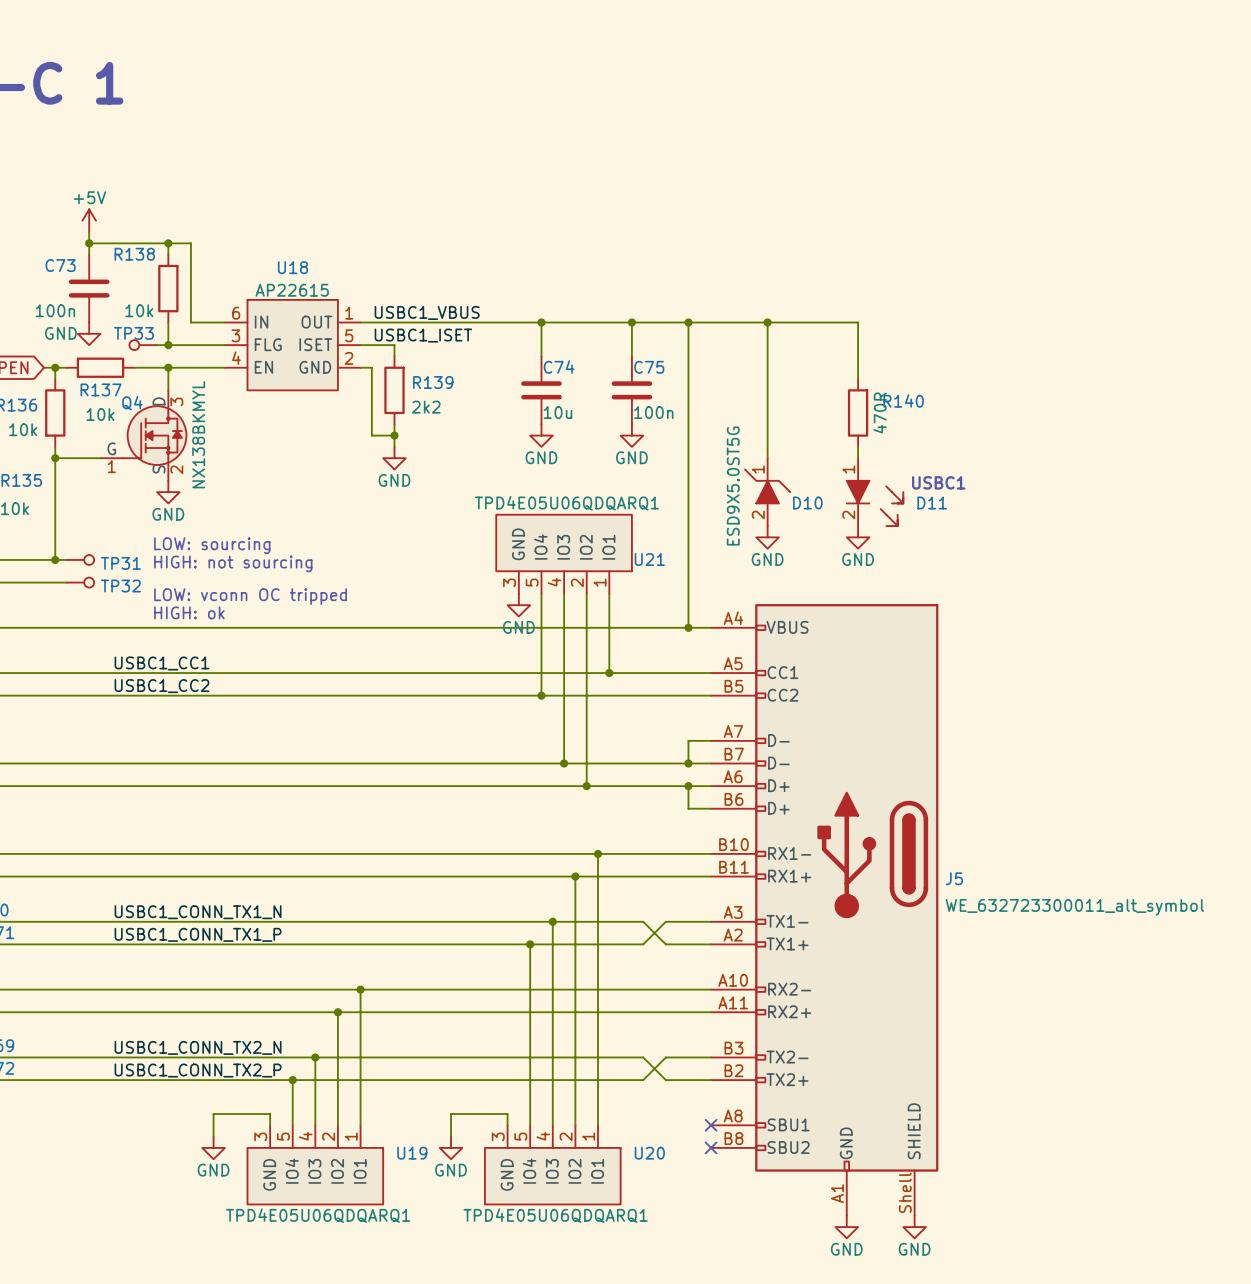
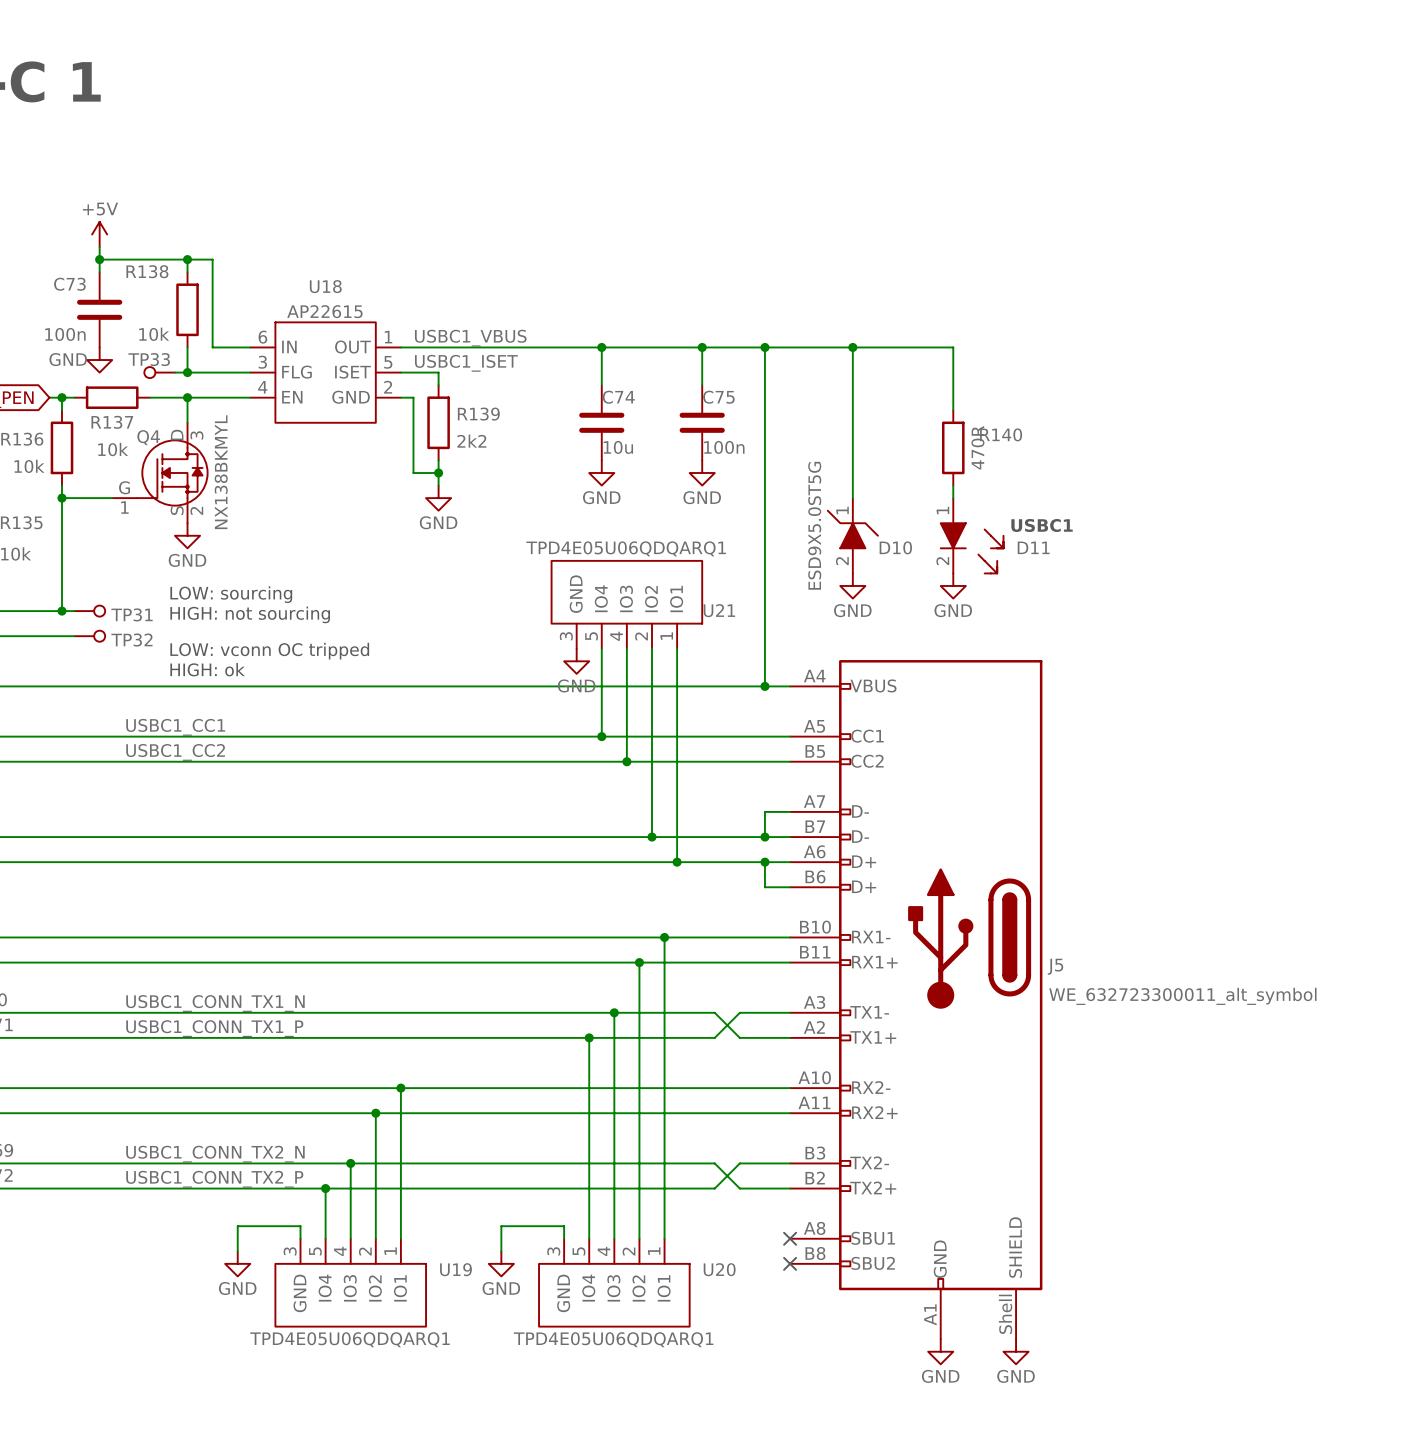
wire: (541, 673) (541, 695) -> none
junction: none -> (601, 736)
wire: none -> (677, 736) (677, 862)
junction: (609, 673) -> none
junction: (541, 695) -> none
wire: (564, 695) (564, 763) -> none
junction: none -> (626, 761)
junction: (564, 763) -> none
wire: (586, 763) (586, 786) -> none
junction: none -> (651, 837)
junction: (586, 786) -> none
junction: none -> (677, 862)

